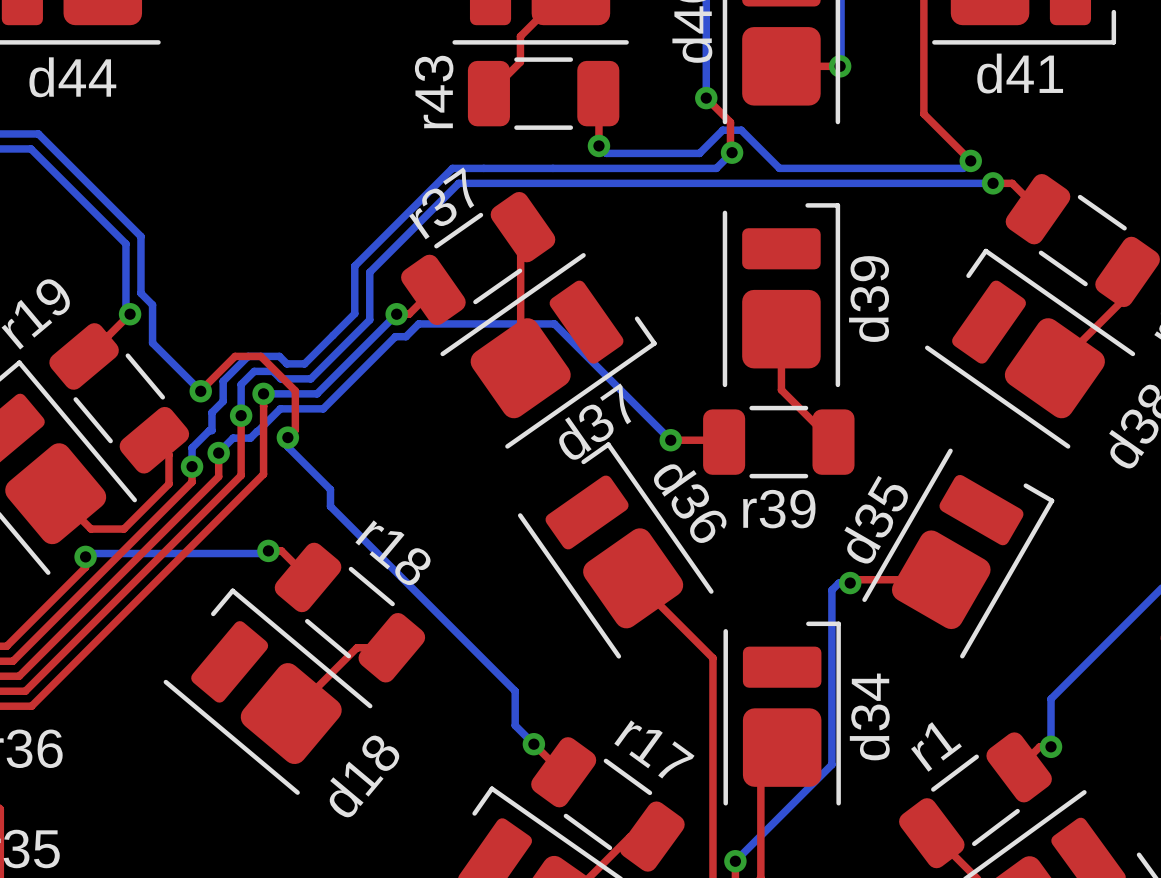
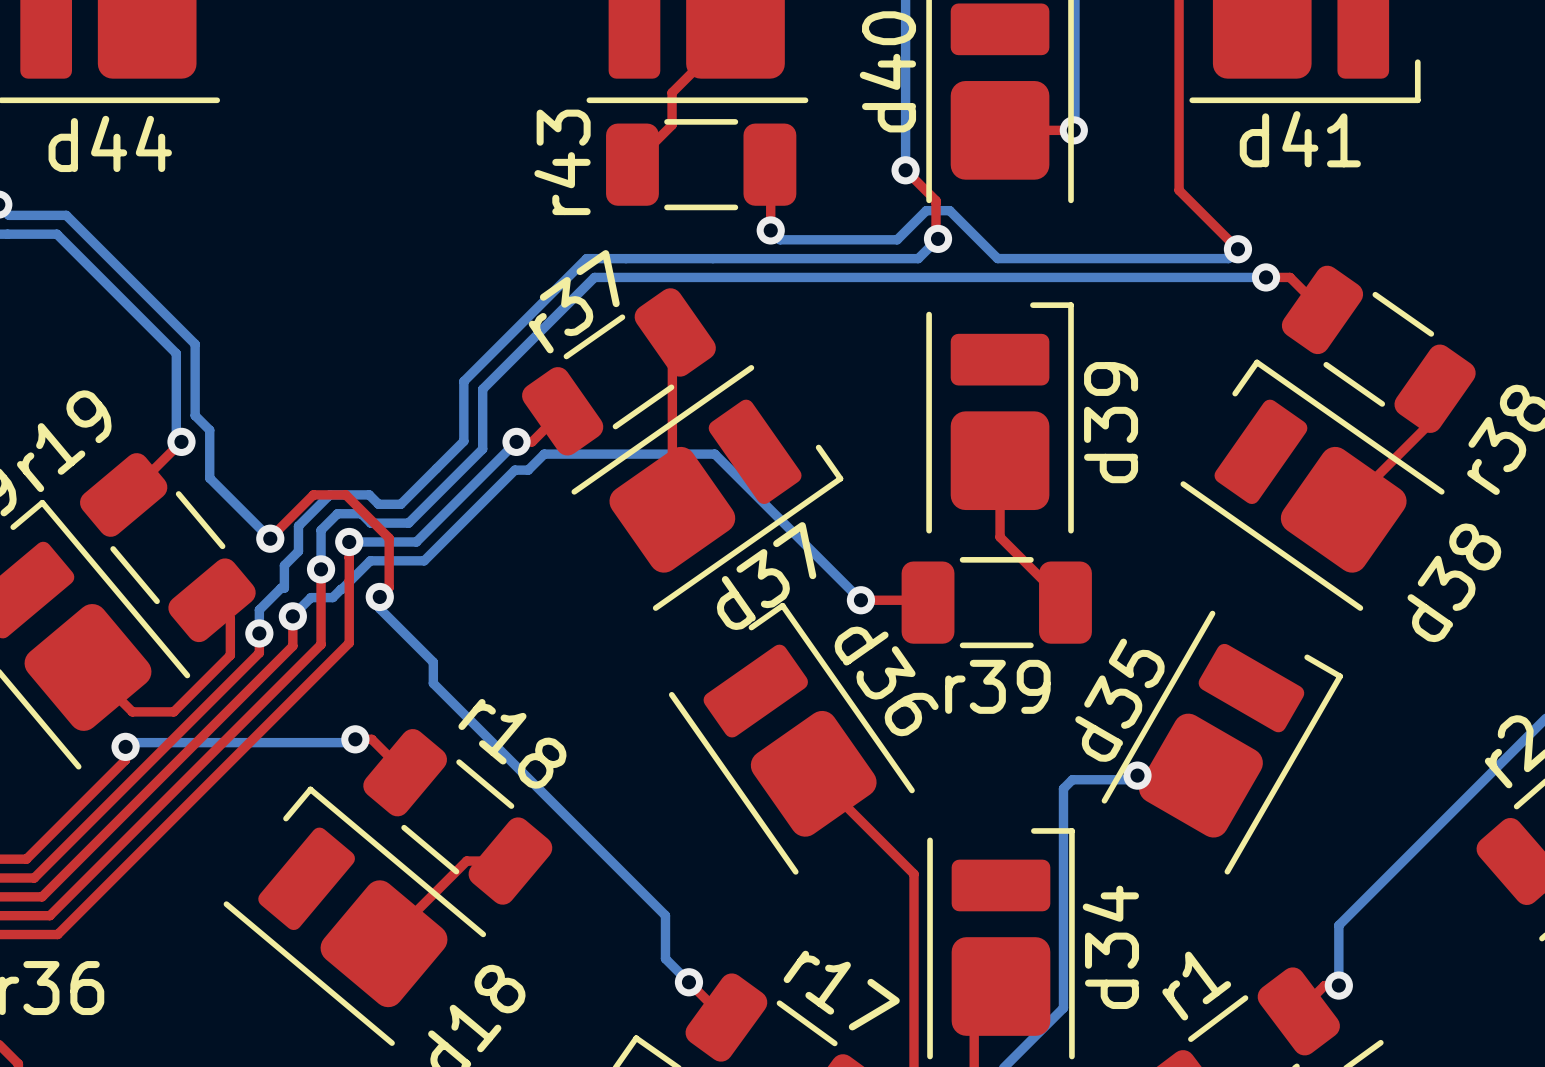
top track: (890, 579) (853, 579) (850, 583) -> none
bottom track: none -> (1137, 775) (1133, 779) (1086, 779)
via position: (850, 583) -> (1137, 775)

